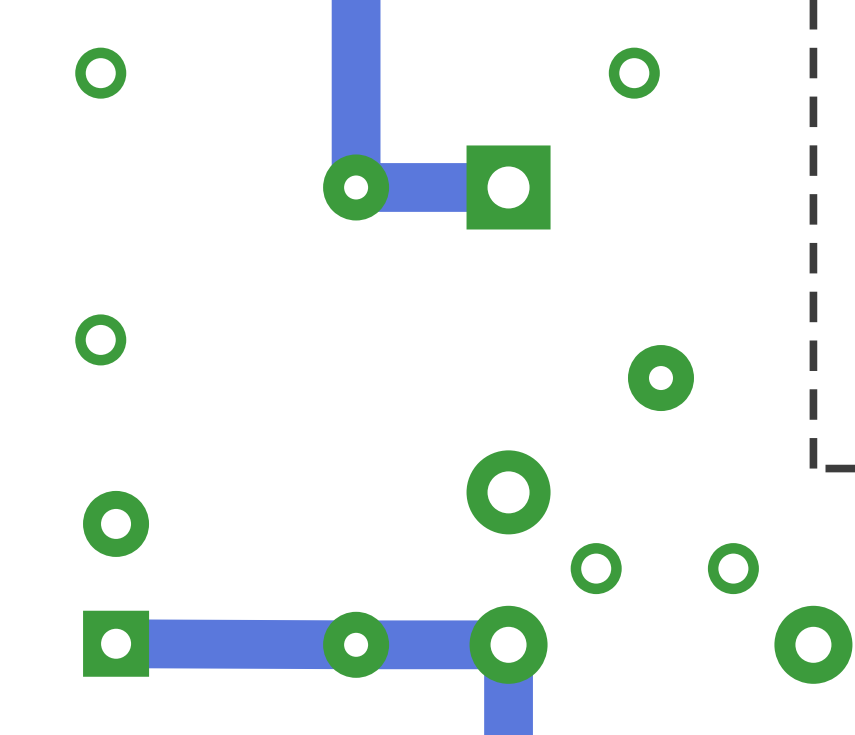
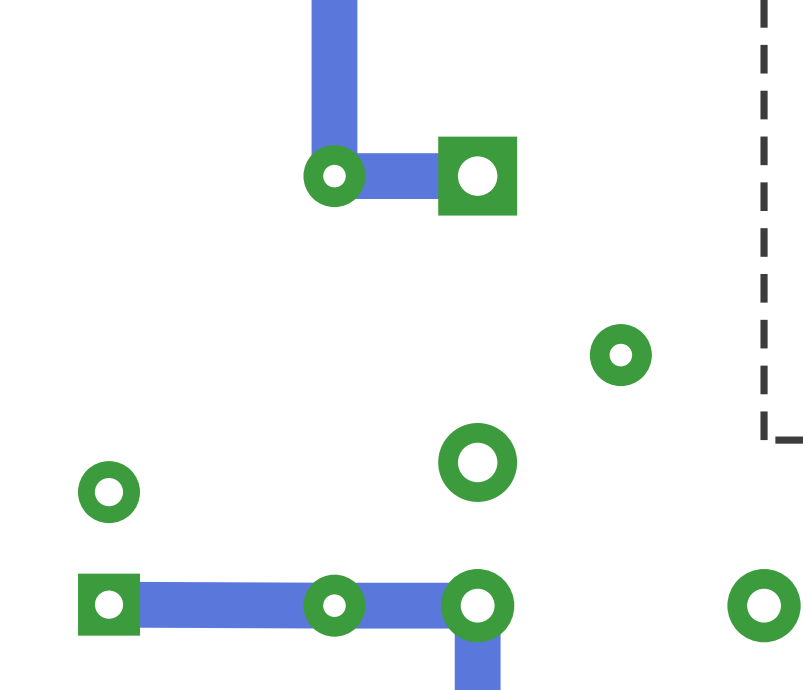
via: (100, 73) -> none
via: (634, 73) -> none
via: (100, 339) -> none
via: (596, 568) -> none
via: (733, 568) -> none

